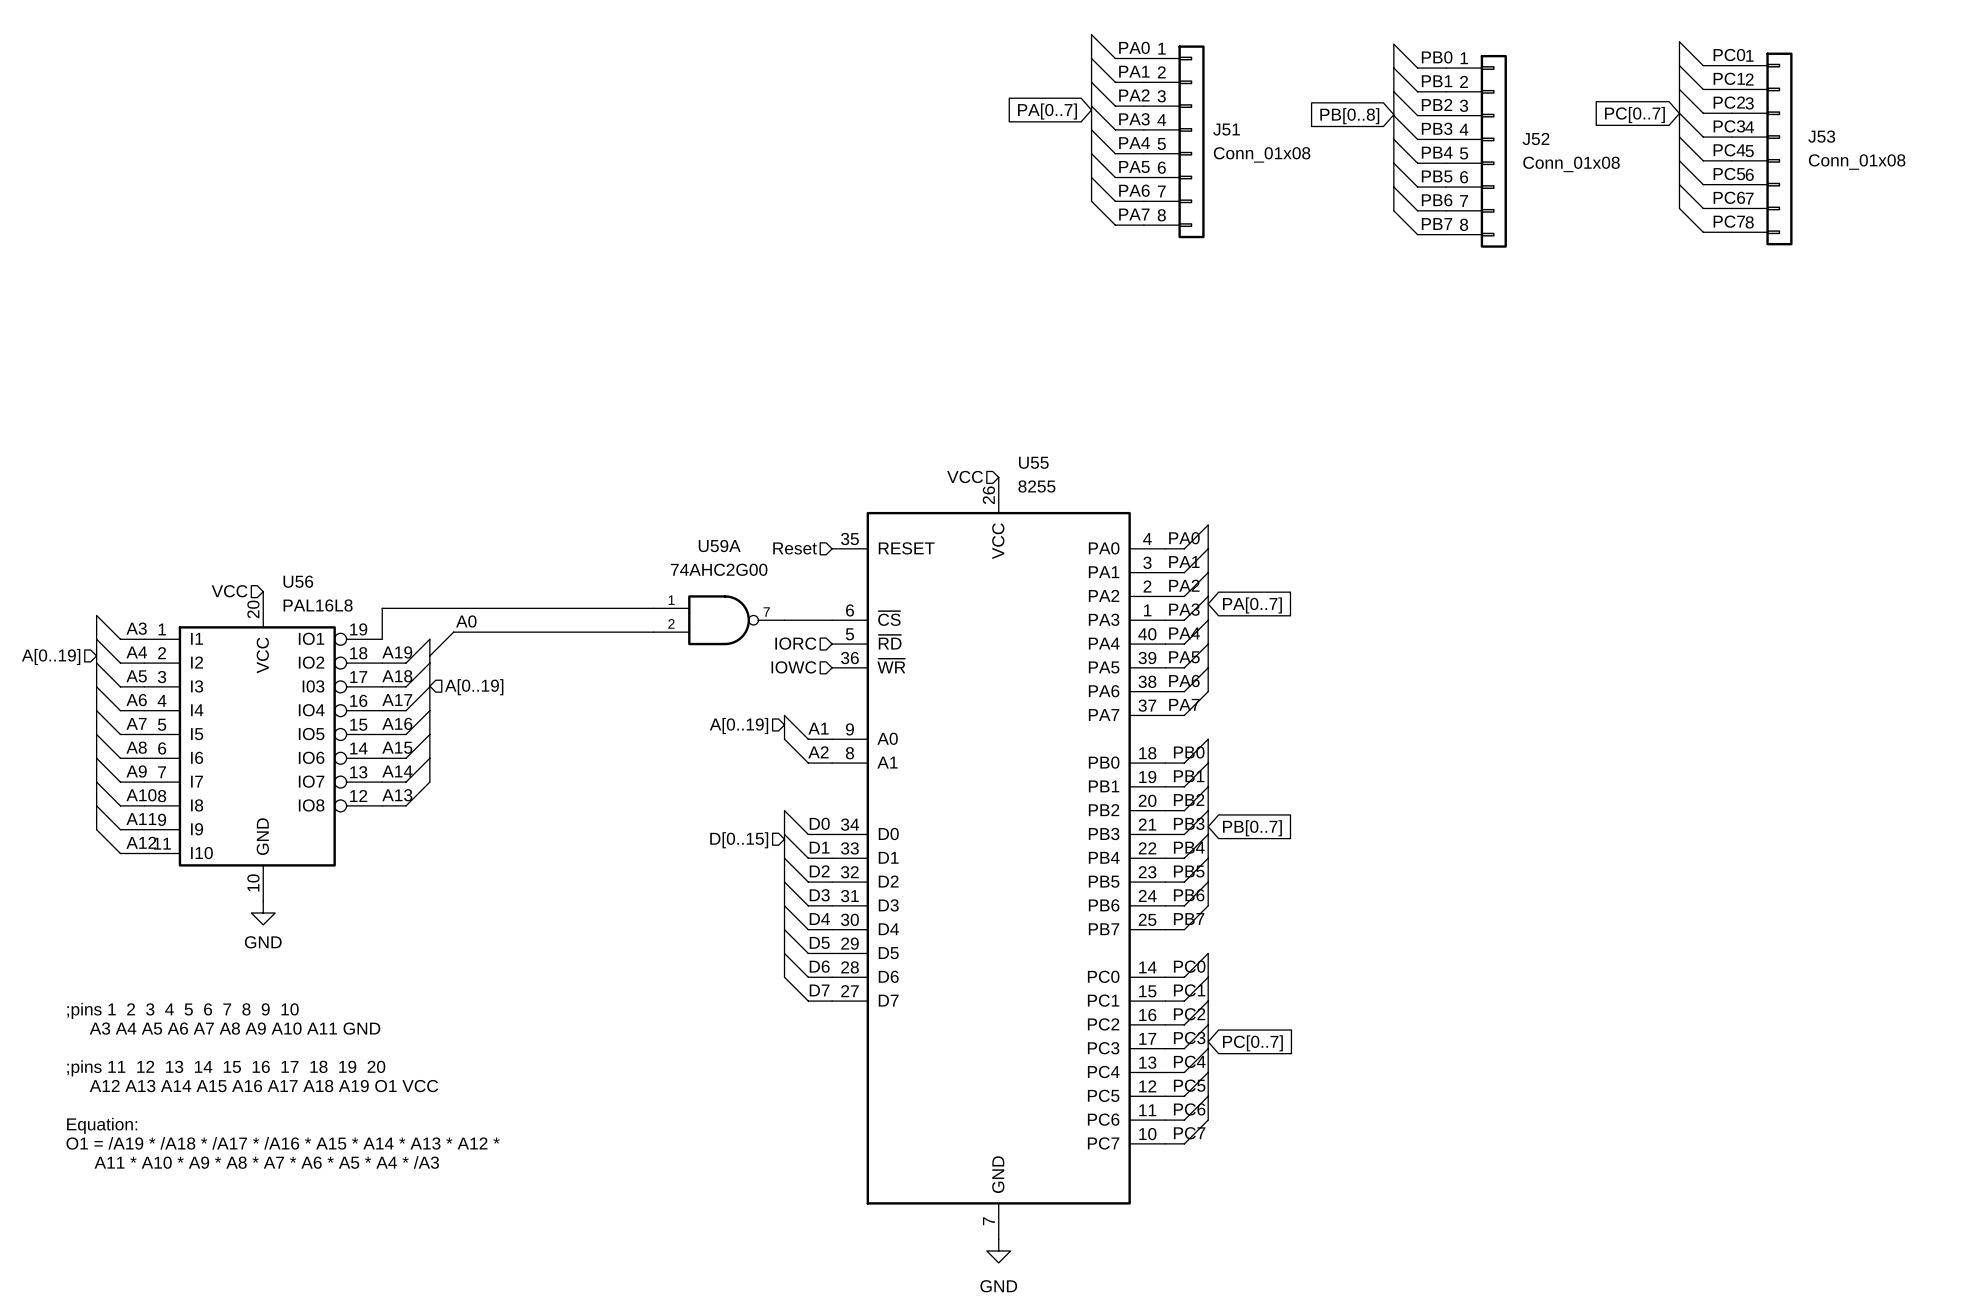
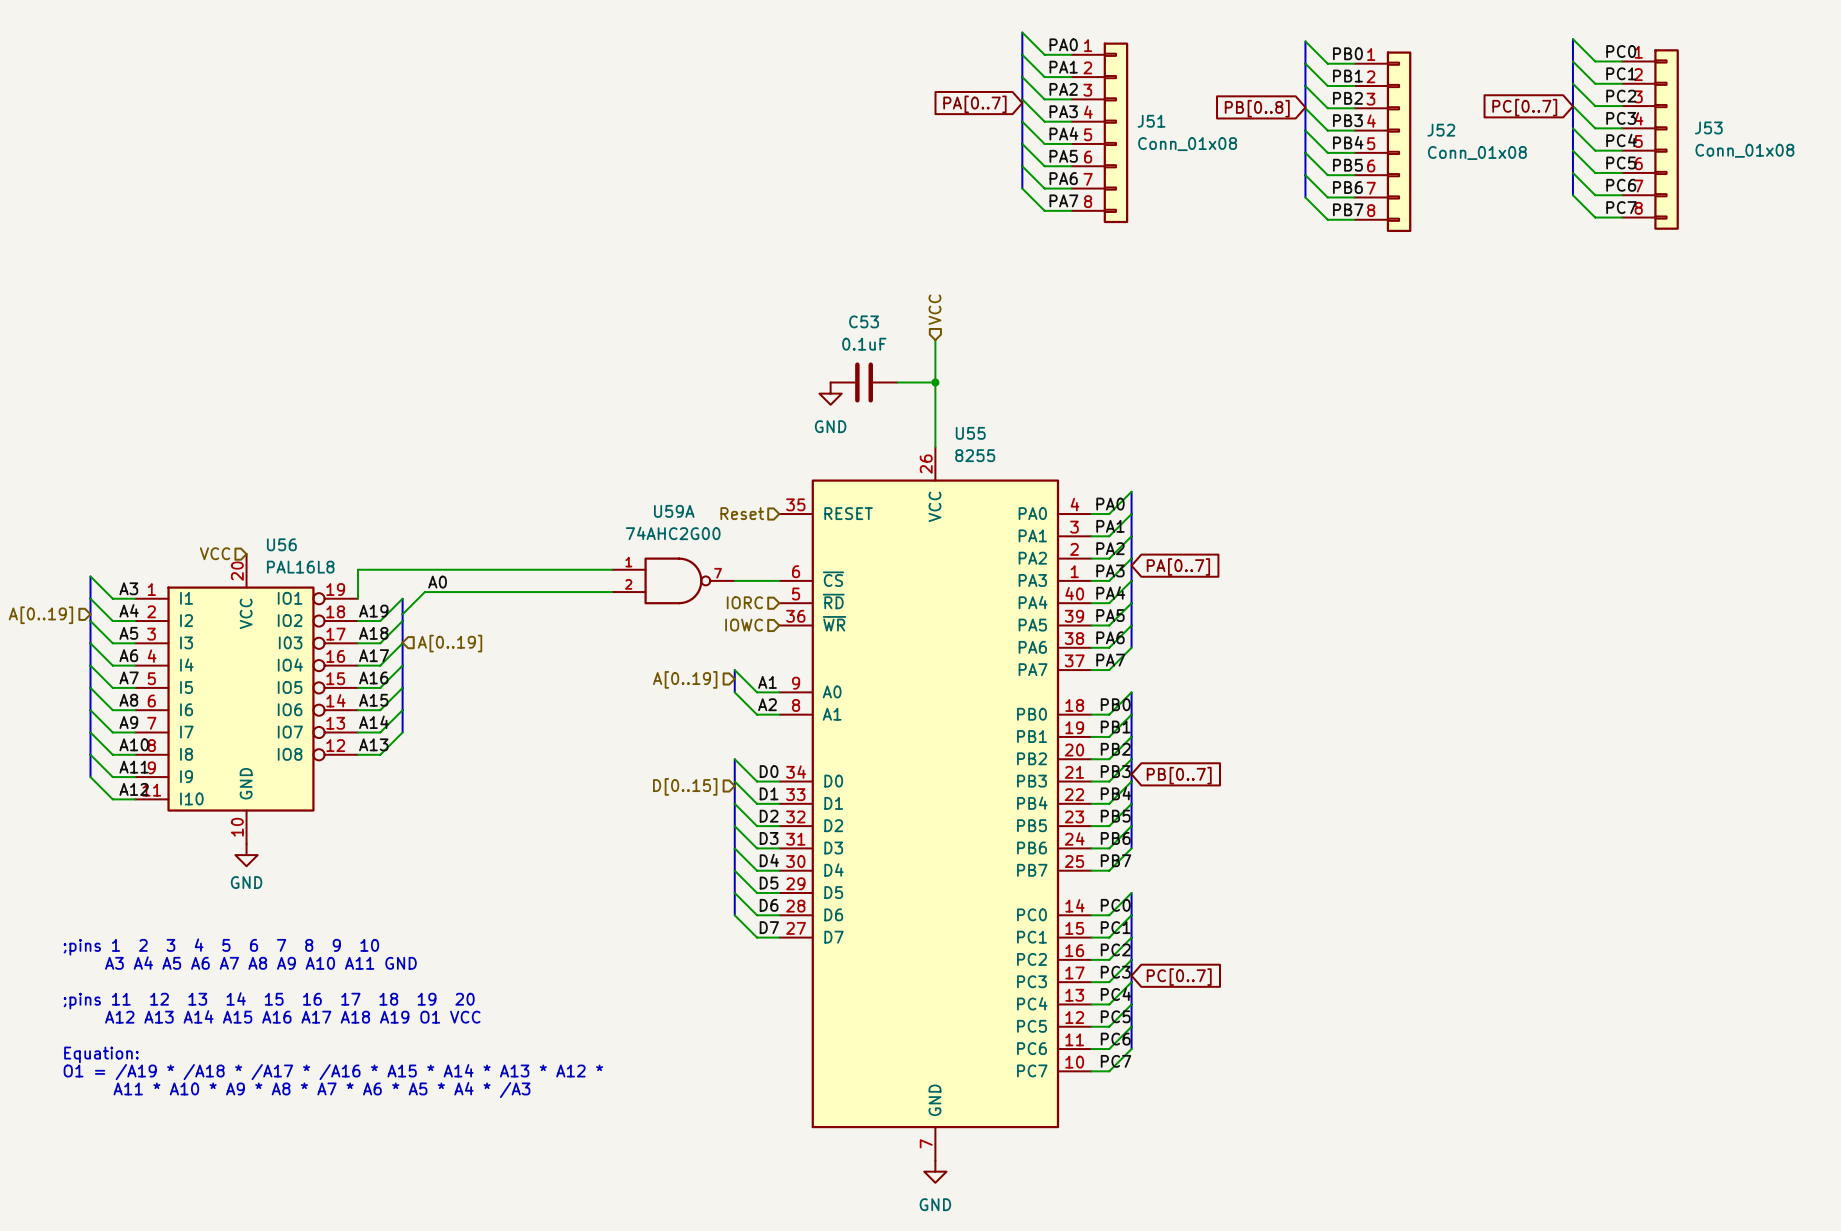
wire: none -> (935, 340) (935, 447)
C53: none -> 0.1uF (864, 382)
wire: none -> (897, 382) (935, 382)
junction: none -> (935, 382)
power symbol: none -> GND (830, 393)
hierarchical label rotation: 0° (965, 476) -> 90° clockwise (934, 309)
hierarchical label position: VCC (965, 476) -> VCC (934, 309)

